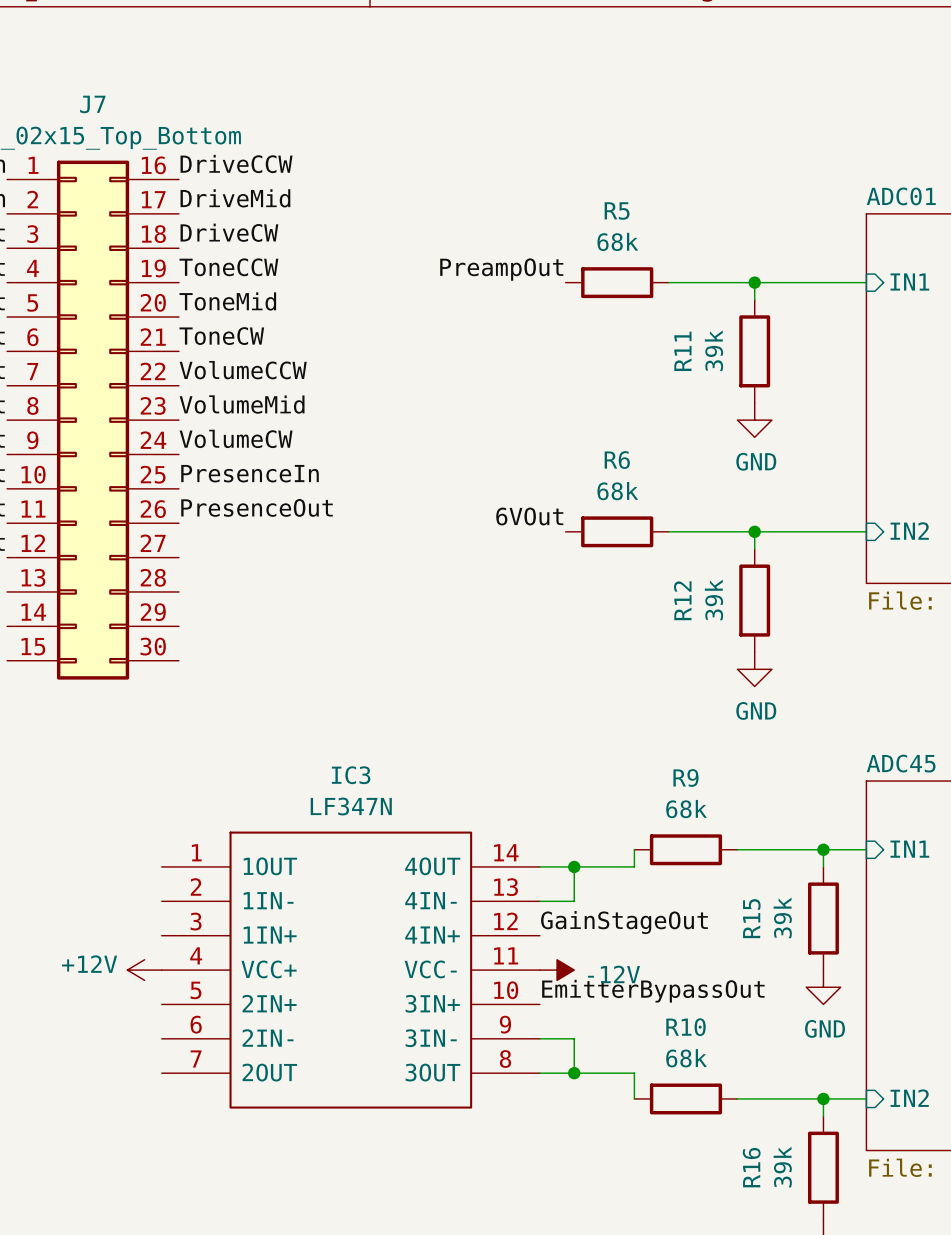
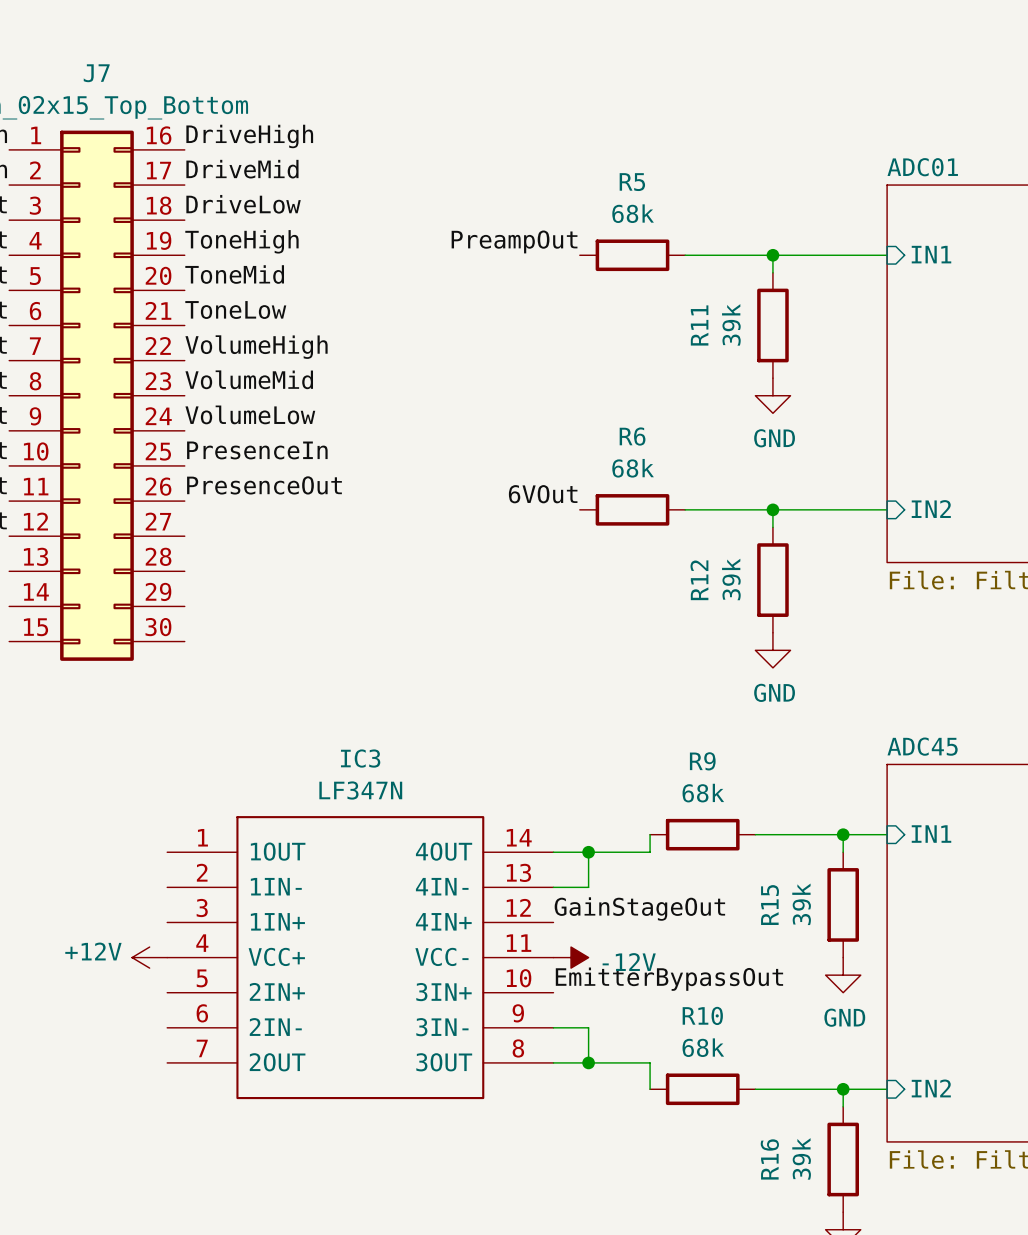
label: DriveCCW (236, 163) -> DriveHigh (249, 136)
label: DriveCW (229, 232) -> DriveLow (243, 204)
label: ToneCCW (228, 267) -> ToneHigh (241, 241)
label: ToneCW (221, 336) -> ToneLow (235, 310)
label: VolumeCCW (243, 370) -> VolumeHigh (256, 347)
label: VolumeCW (236, 438) -> VolumeLow (250, 414)

